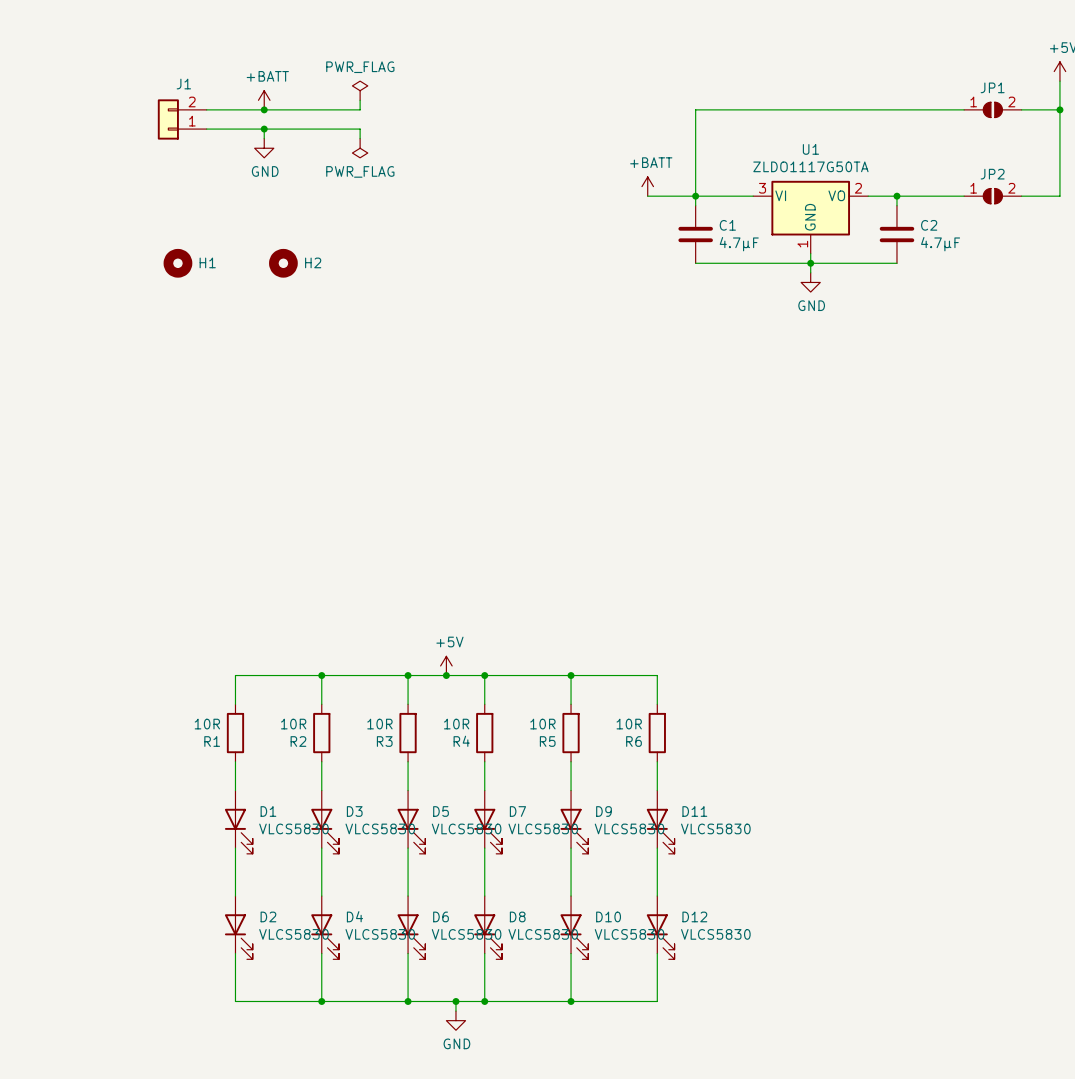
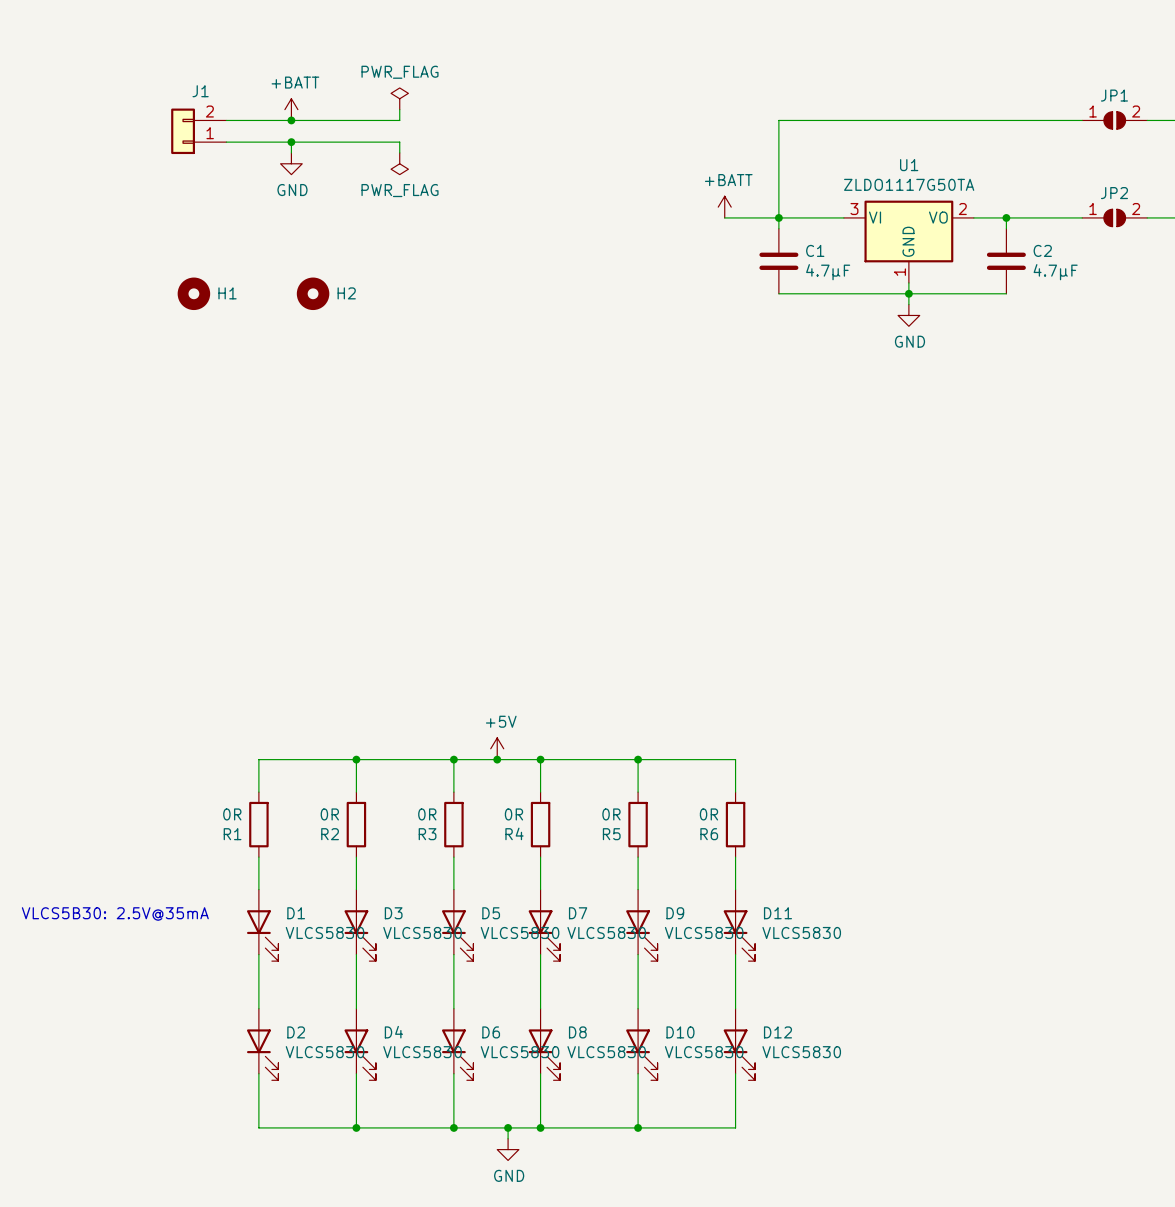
R1 value: 10R (207, 724) -> 0R (232, 814)
R2 value: 10R (293, 724) -> 0R (329, 814)
R3 value: 10R (379, 724) -> 0R (427, 814)
R4 value: 10R (456, 724) -> 0R (513, 814)
R5 value: 10R (542, 724) -> 0R (611, 814)
R6 value: 10R (629, 724) -> 0R (708, 814)
text: none -> VLCS5B30: 2.5V@35mA (115, 914)

